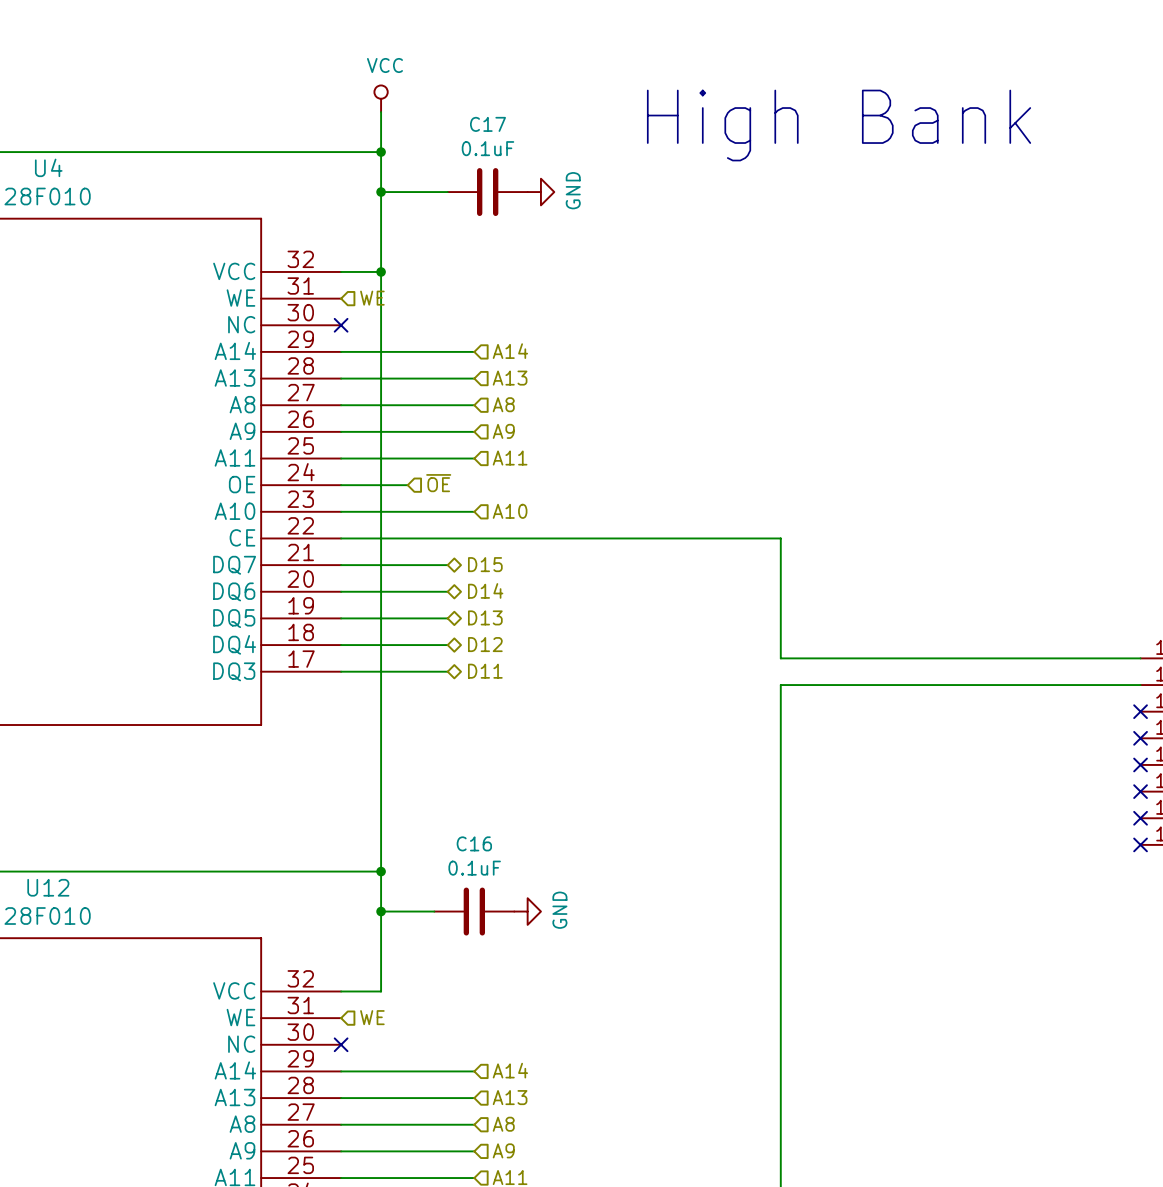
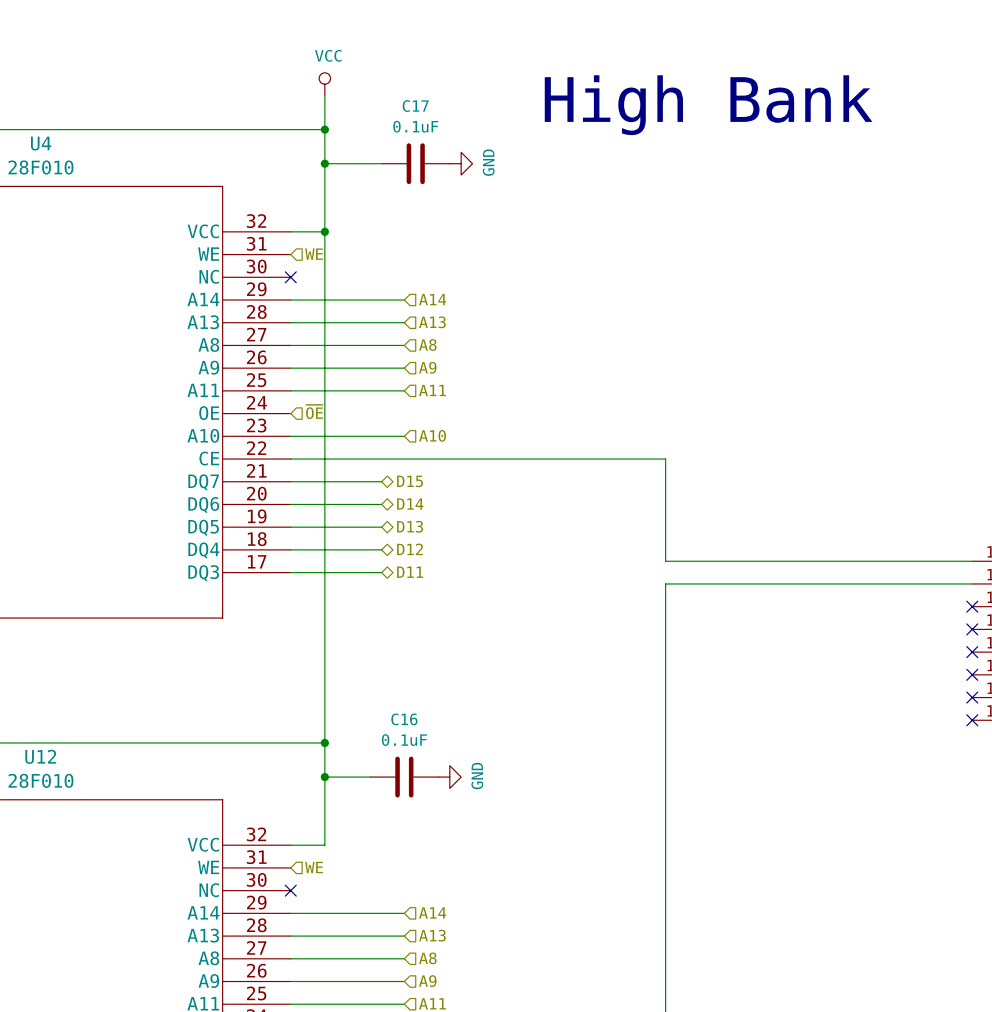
hierarchical label position: ~{OE} (438, 483) -> ~{OE} (314, 411)
wire: (341, 485) (407, 485) -> none

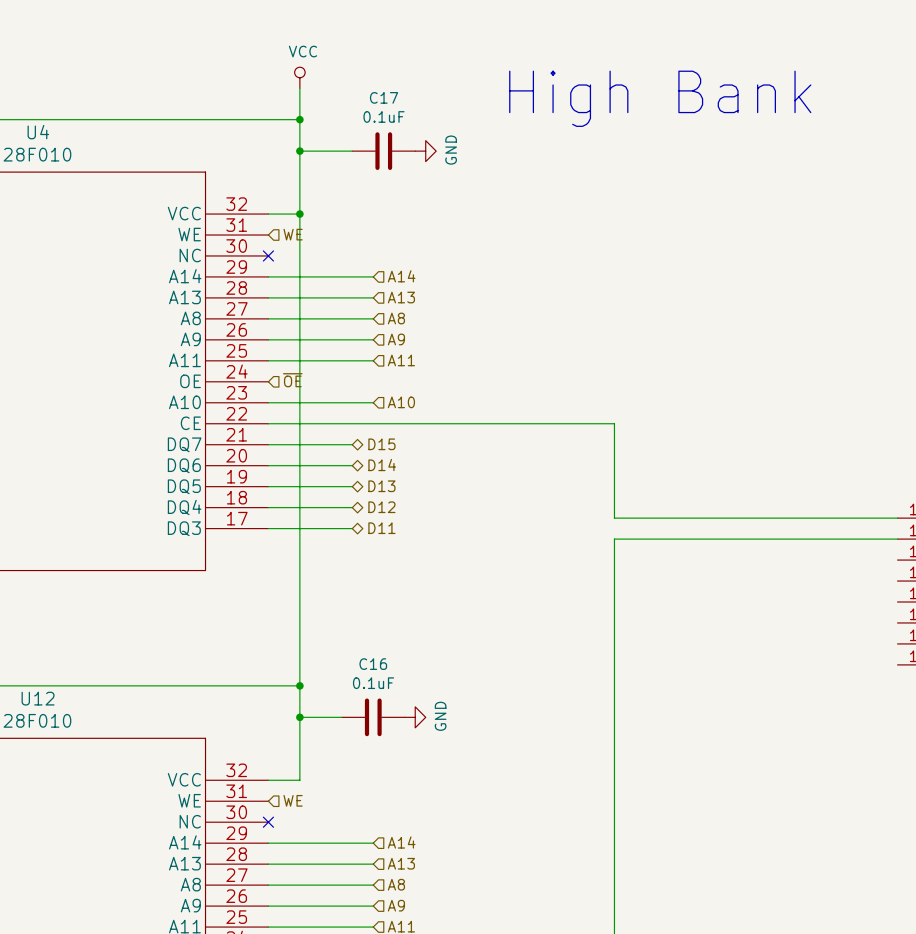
no-connect mark: (972, 606) -> none
no-connect mark: (972, 629) -> none
no-connect mark: (972, 652) -> none
no-connect mark: (972, 674) -> none
no-connect mark: (972, 697) -> none
no-connect mark: (972, 720) -> none

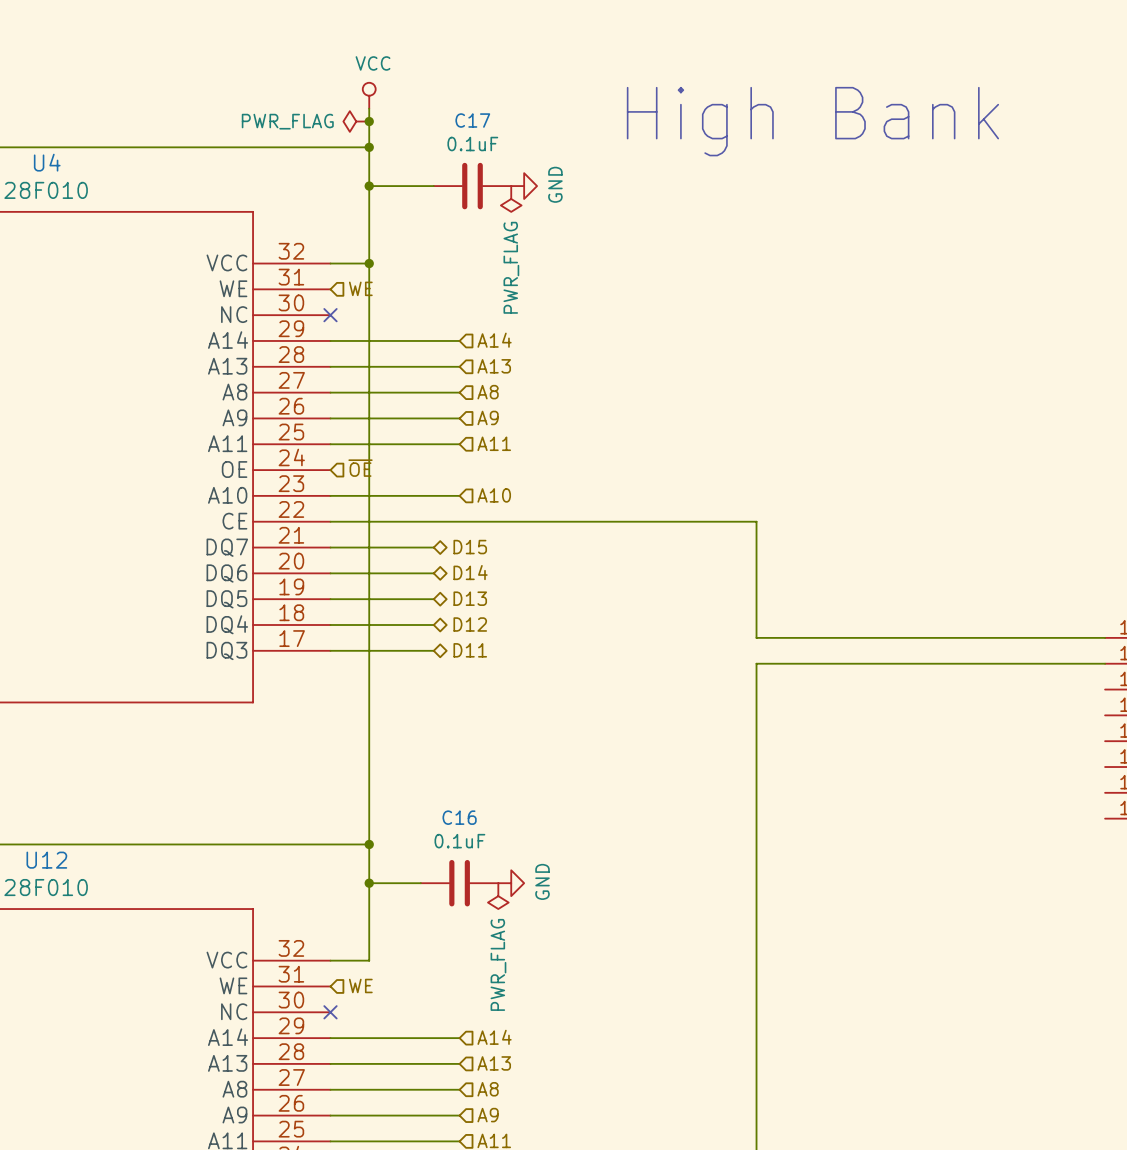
power symbol: none -> PWR_FLAG (356, 121)
junction: none -> (369, 121)
power symbol: none -> PWR_FLAG (511, 198)
power symbol: none -> PWR_FLAG (498, 896)

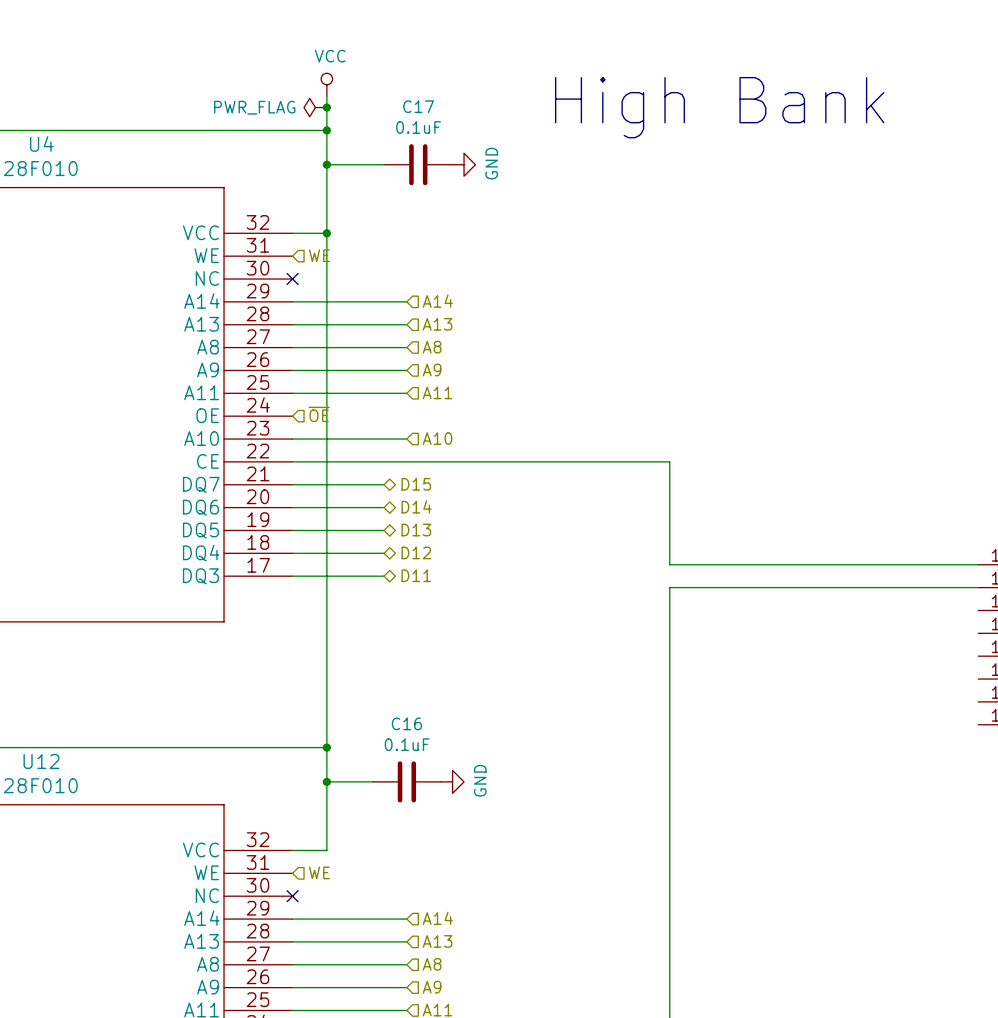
power symbol: PWR_FLAG (511, 198) -> none
power symbol: PWR_FLAG (498, 896) -> none

